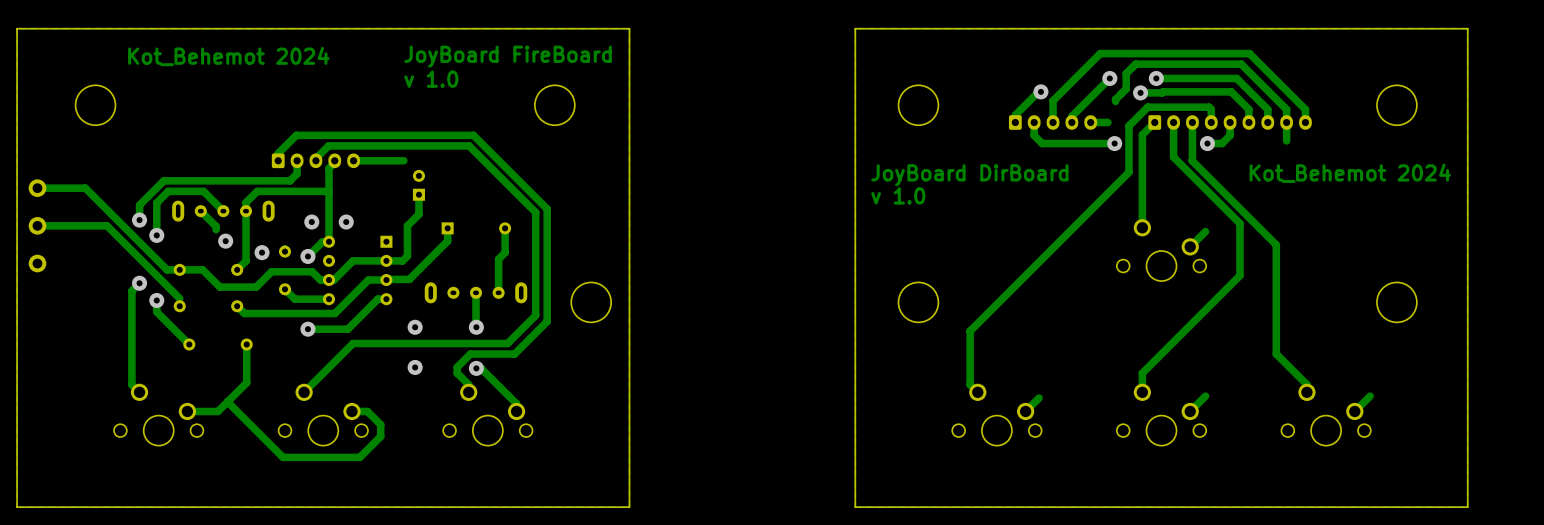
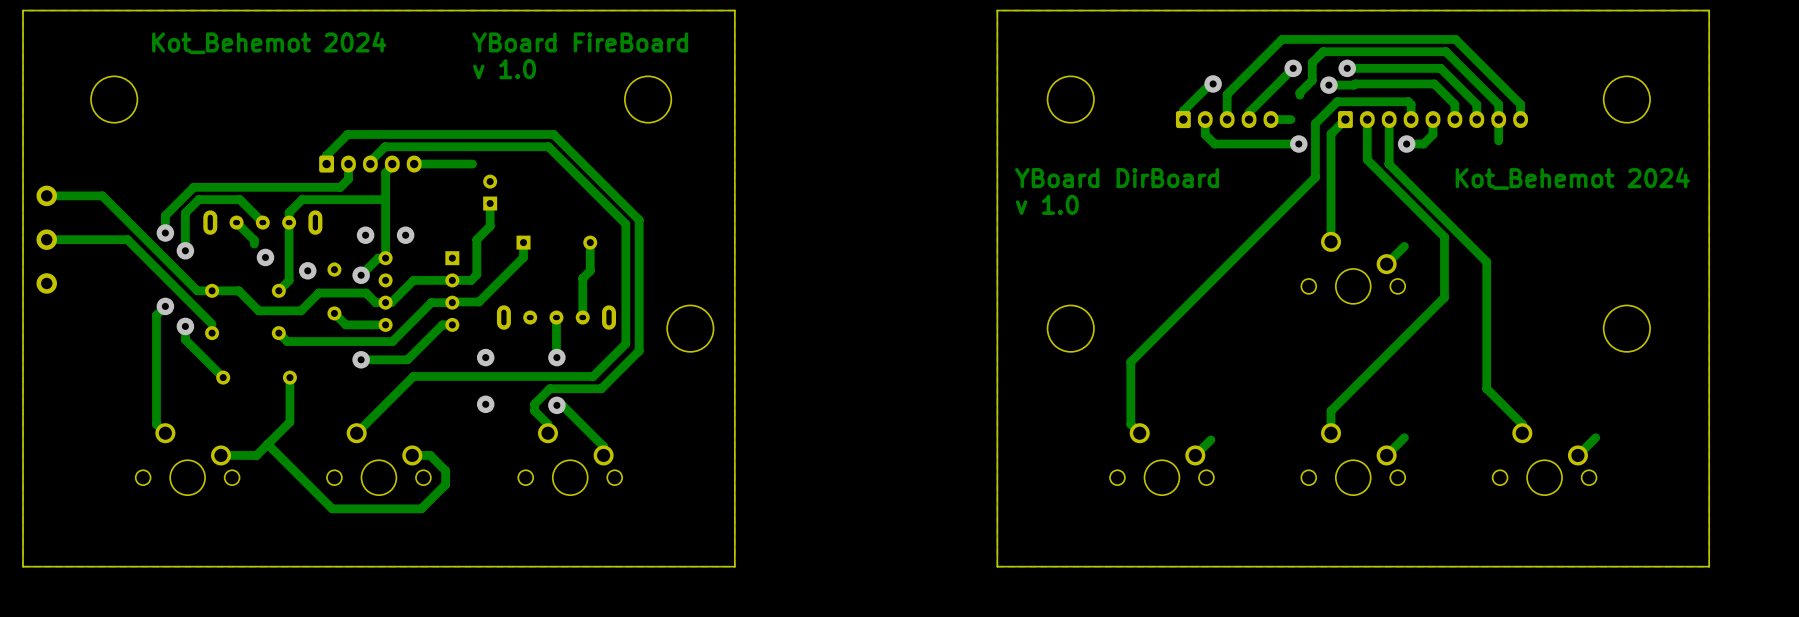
text: JoyBoard FireBoard (508, 56) -> YBoard FireBoard (580, 42)
text: JoyBoard DirBoard (969, 175) -> YBoard DirBoard (1117, 178)

